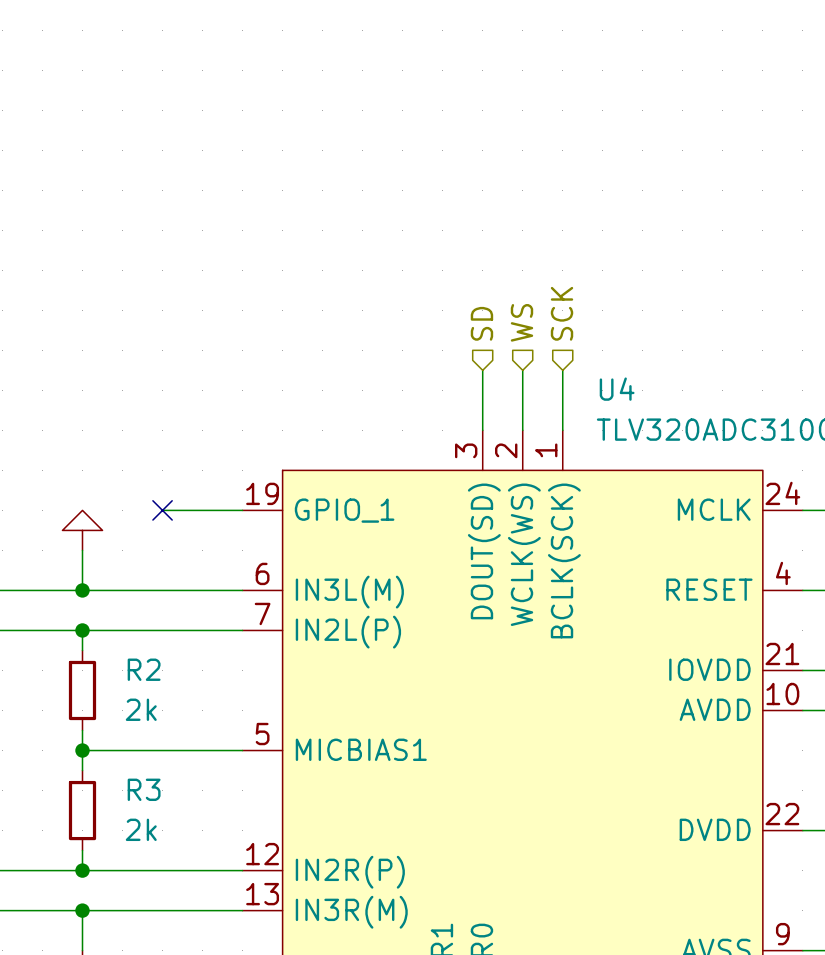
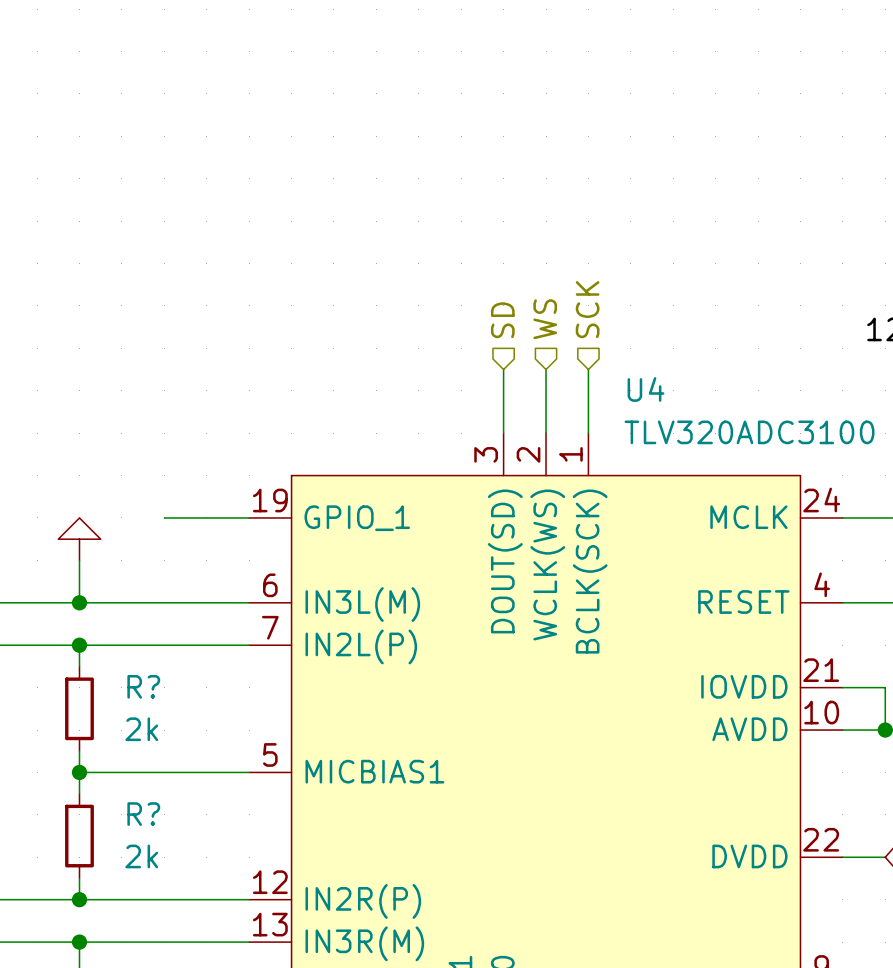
no-connect mark: (162, 510) -> none
R2 name: R2 (144, 669) -> R? (143, 686)
R3 name: R3 (144, 789) -> R? (143, 814)

